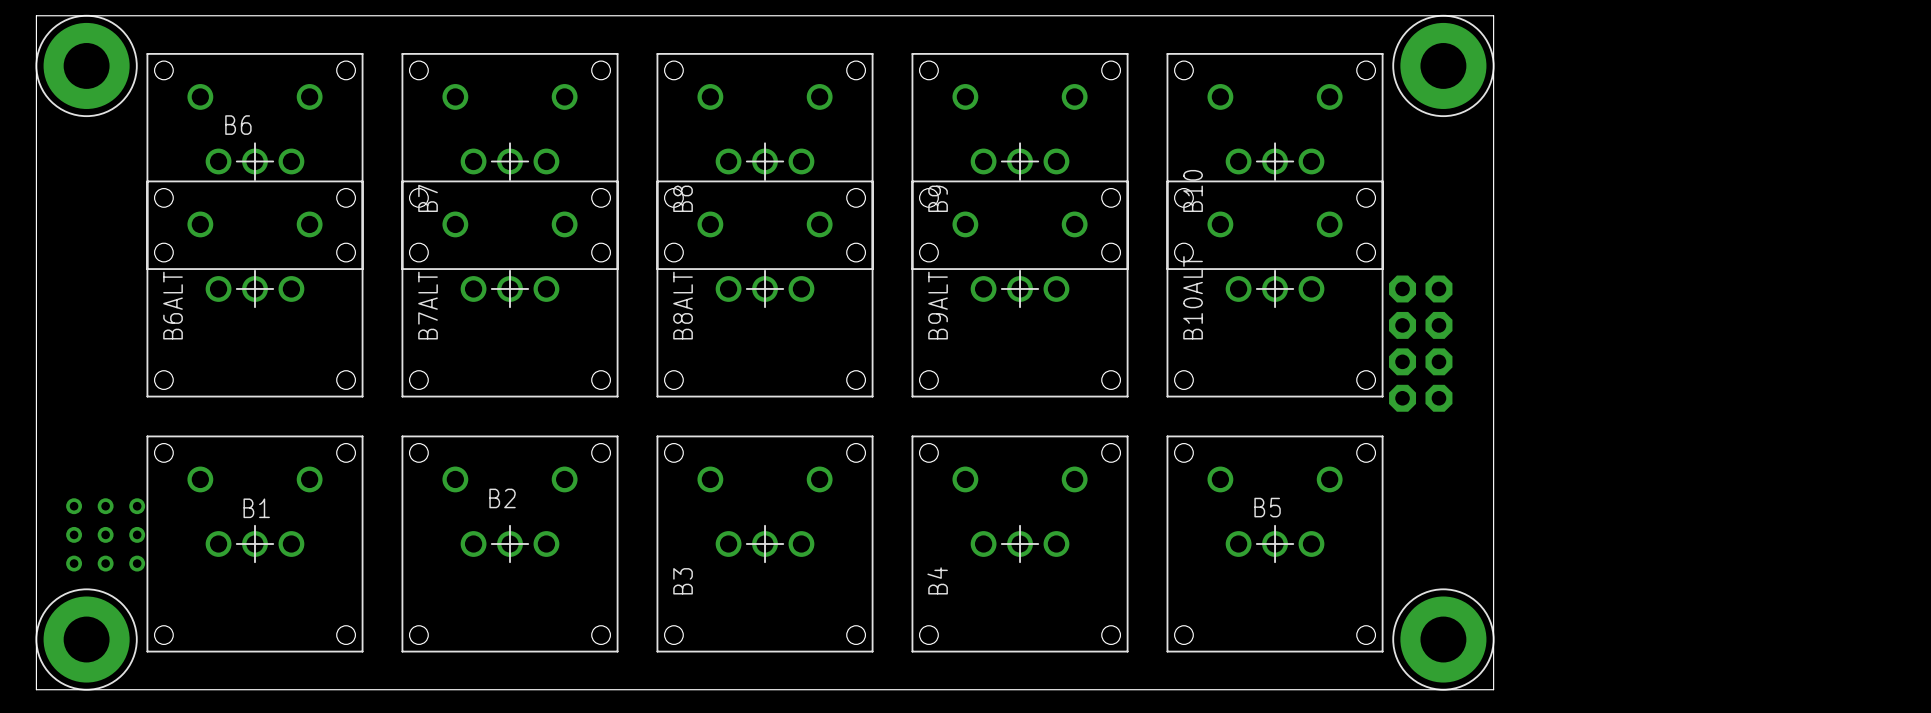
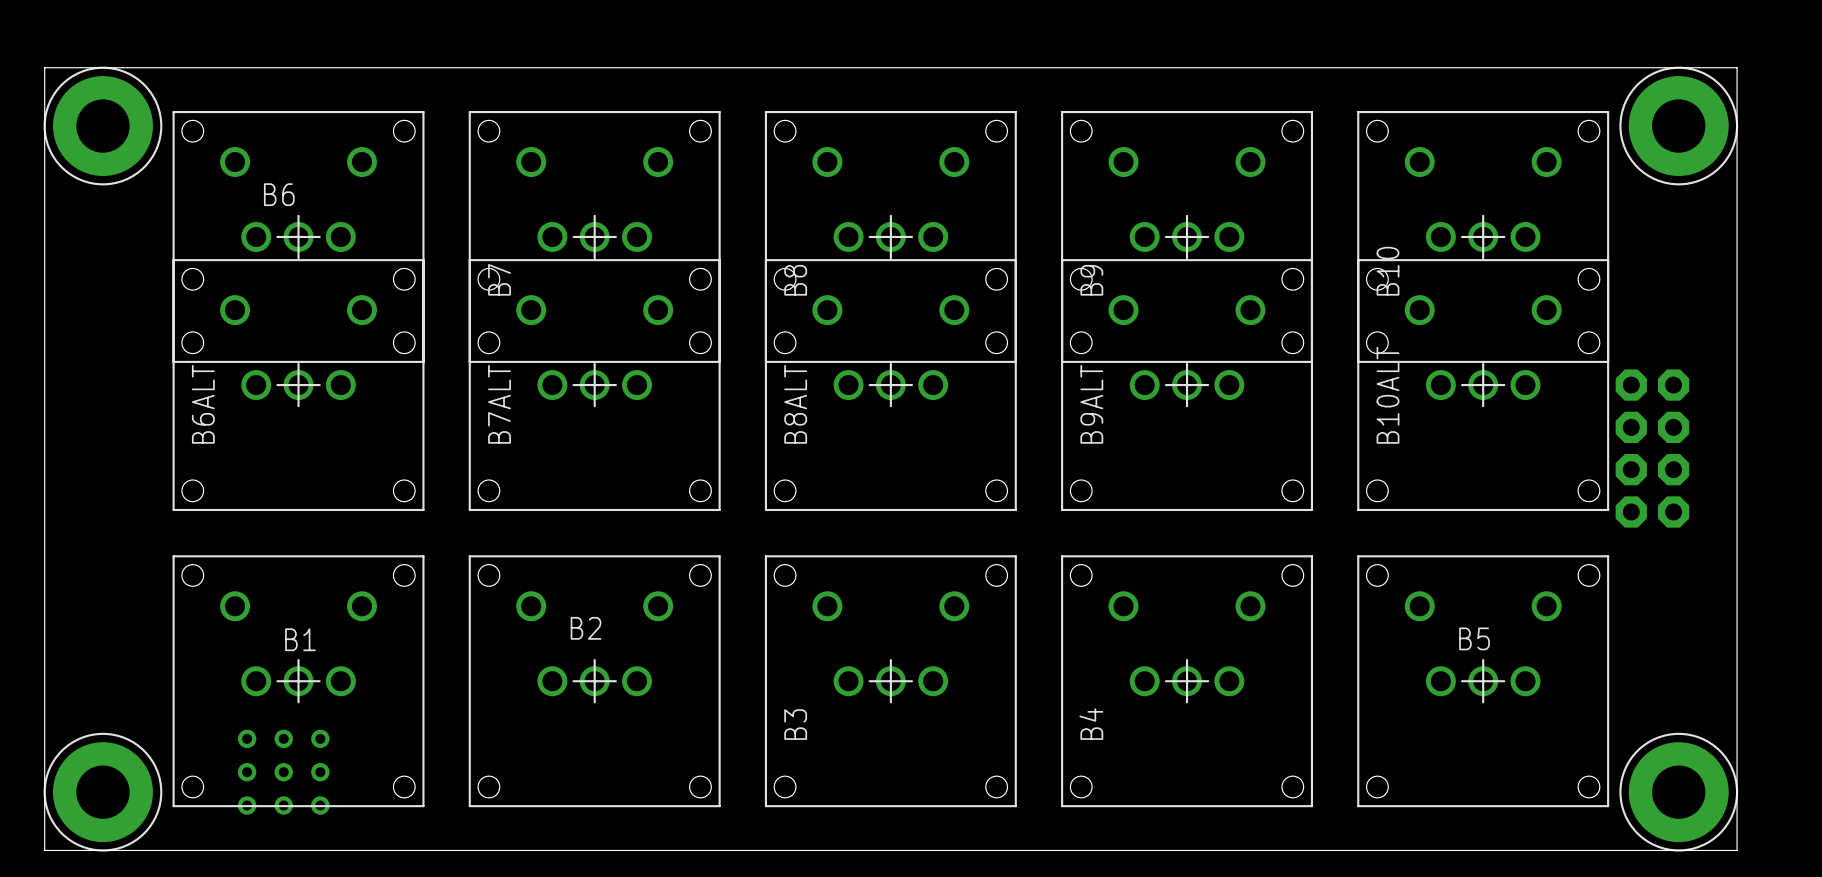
part position: (105, 534) -> (283, 772)

